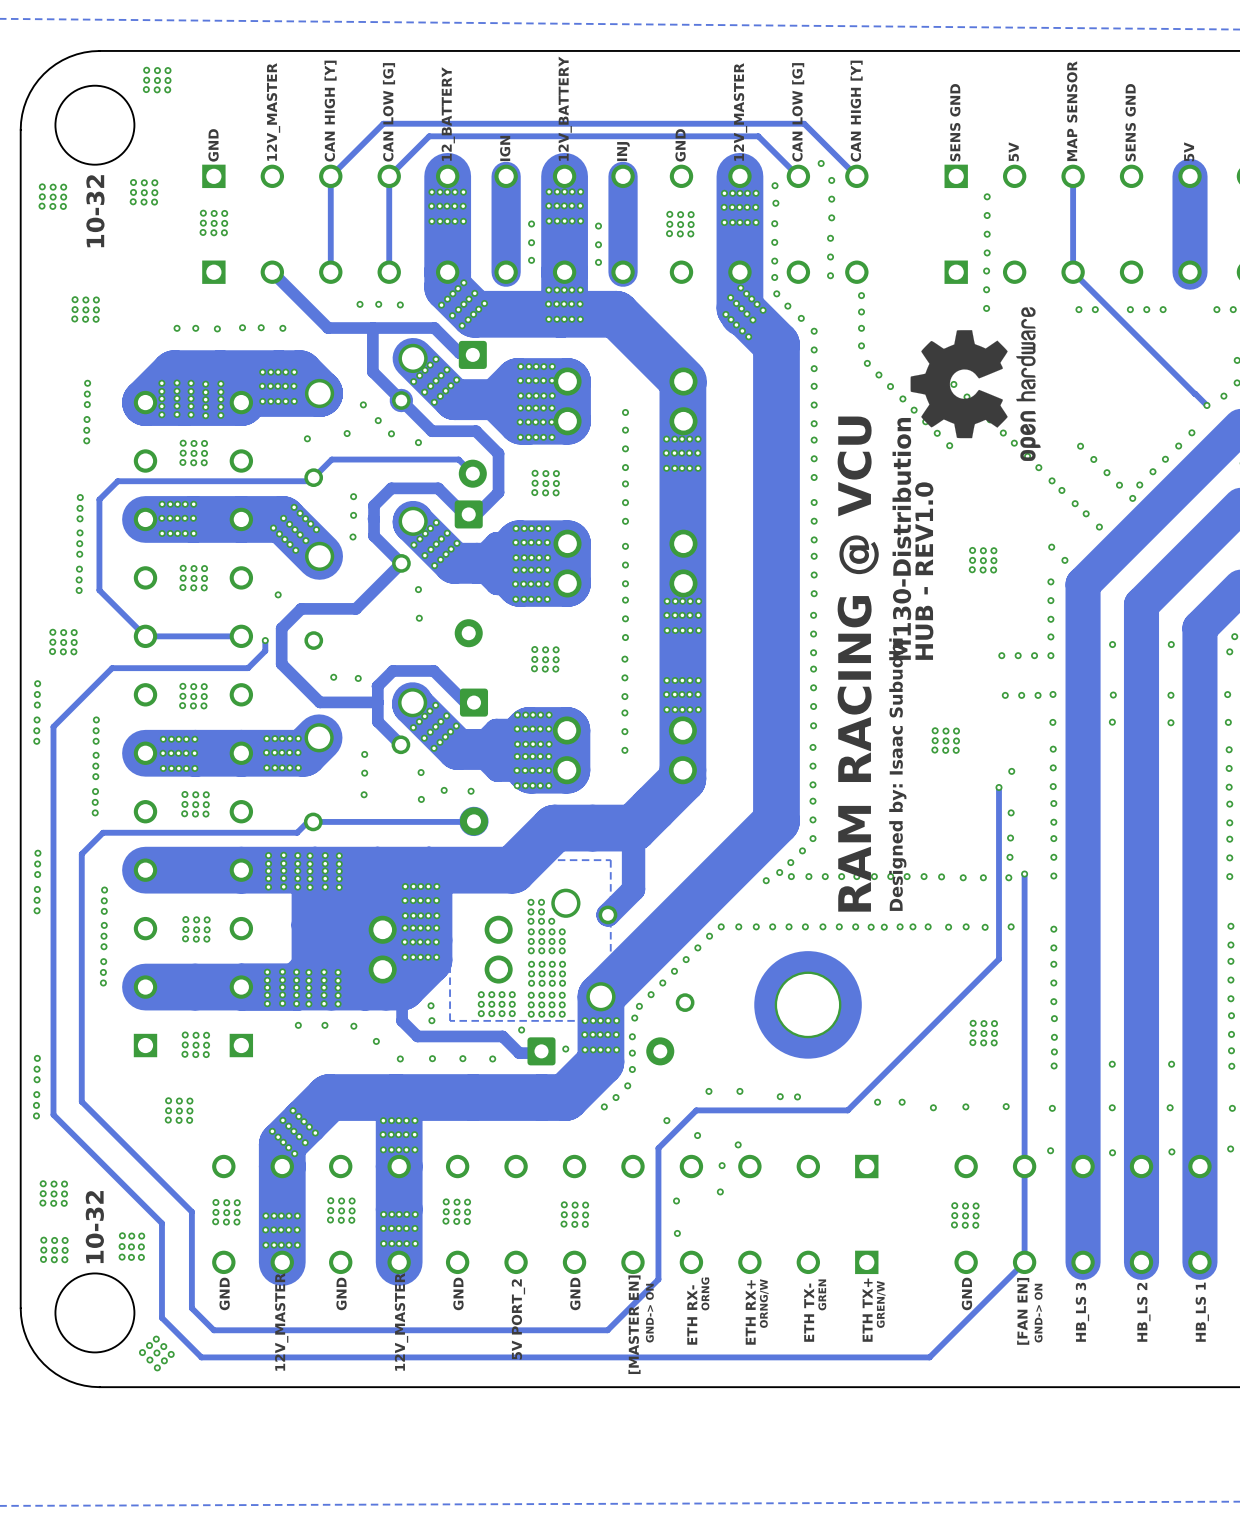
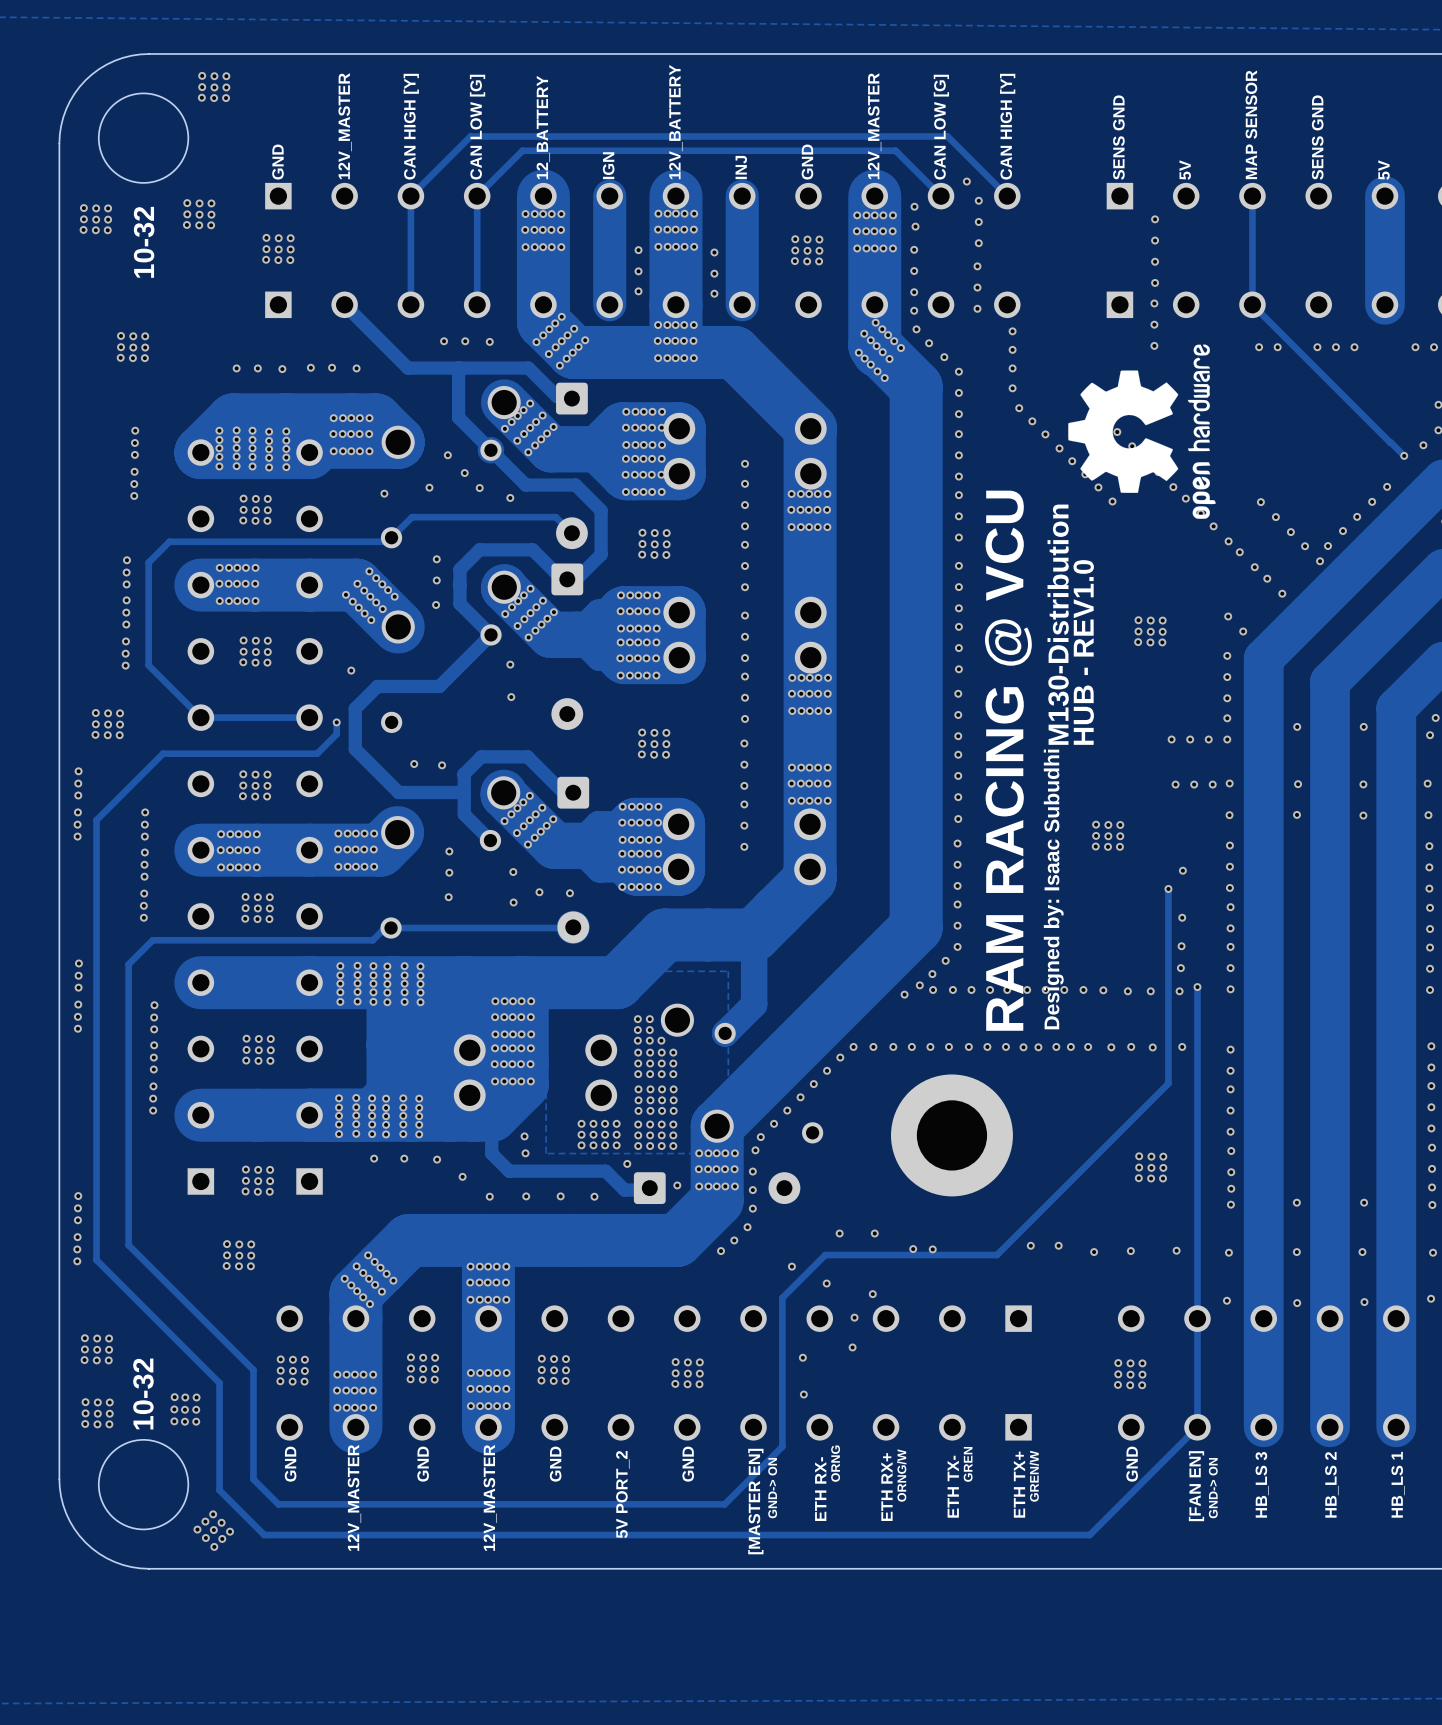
via: (780, 1096) -> none
via: (797, 1096) -> none
via: none -> (913, 1249)
via: none -> (932, 1249)

